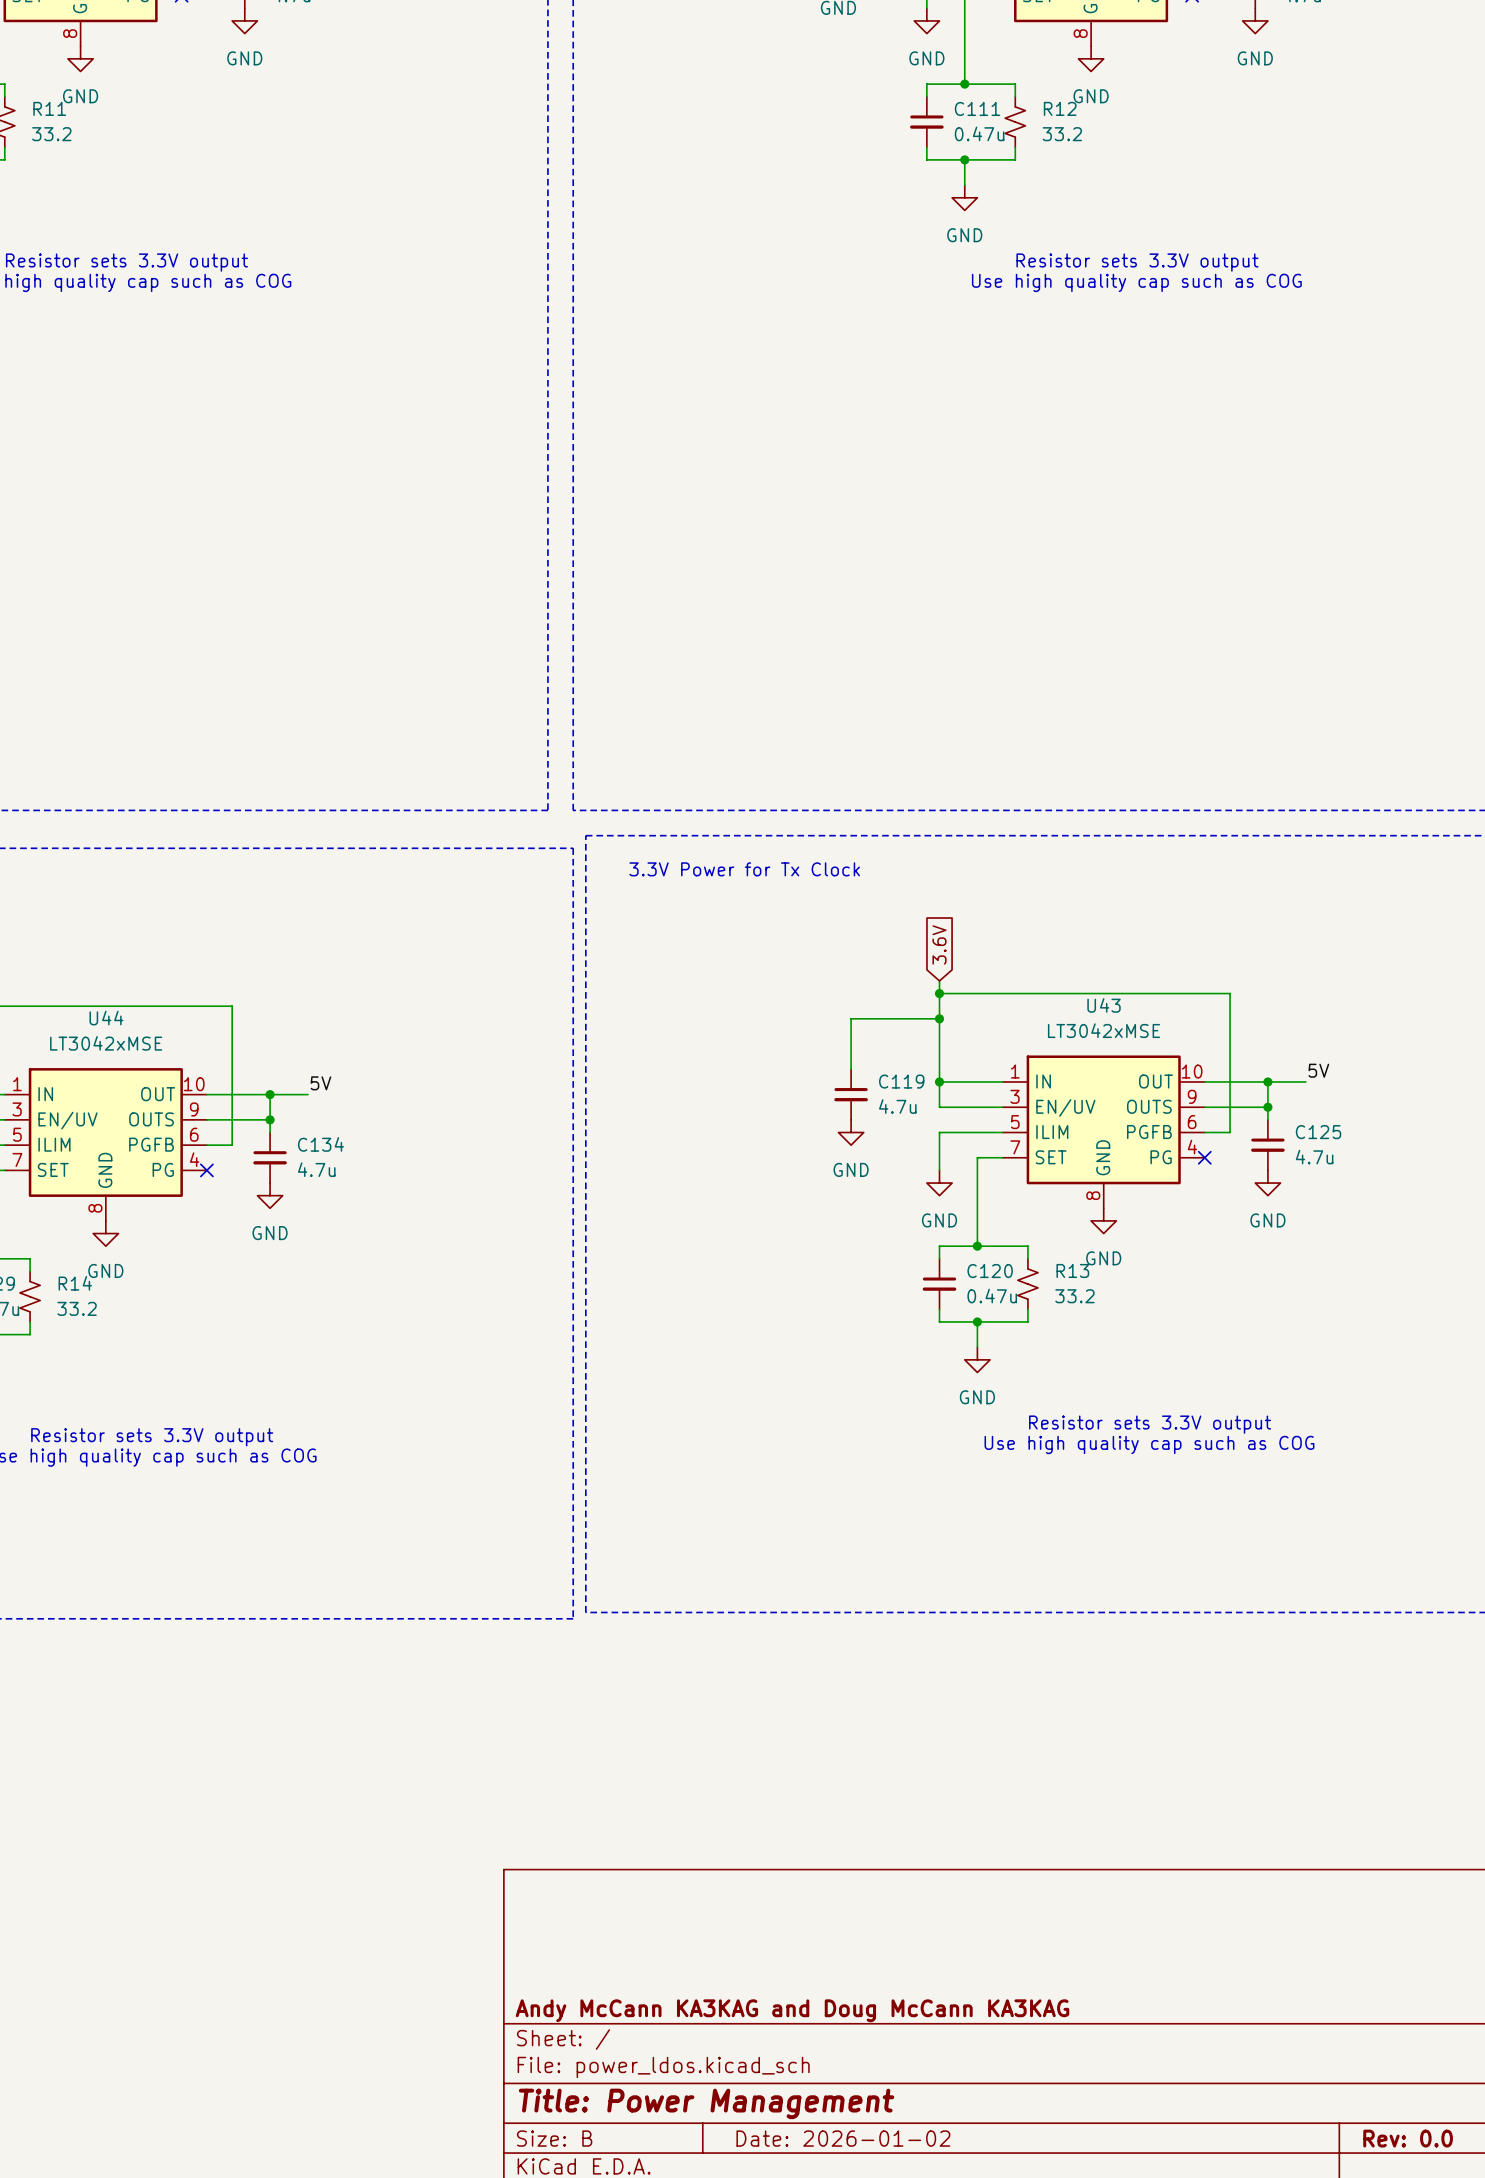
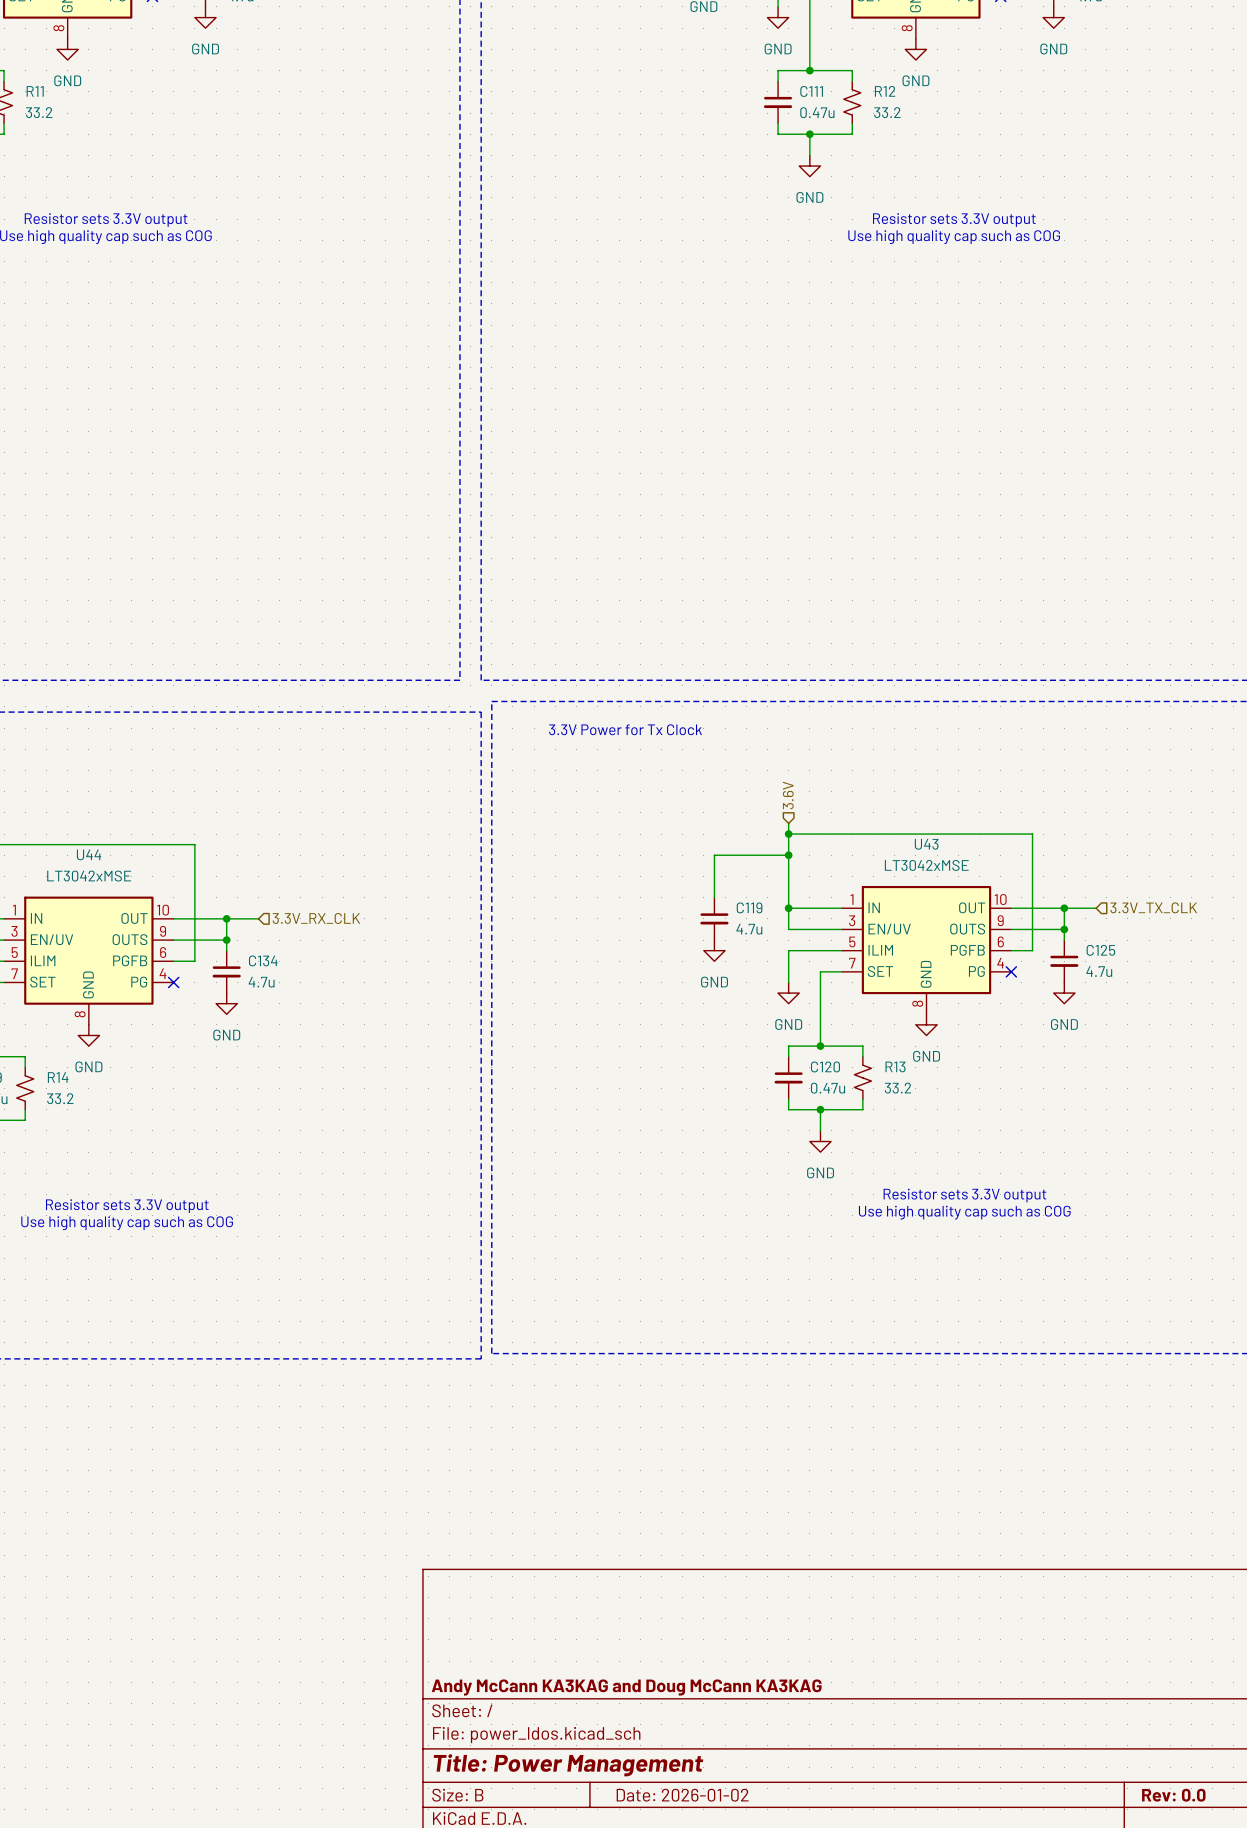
hierarchical label: none -> 3.6V (788, 795)
global label: 3.6V (939, 944) -> none
label: 5V (1318, 1070) -> none
hierarchical label: none -> 3.3V_TX_CLK (1153, 907)
label: 5V (320, 1083) -> none
hierarchical label: none -> 3.3V_RX_CLK (316, 918)

